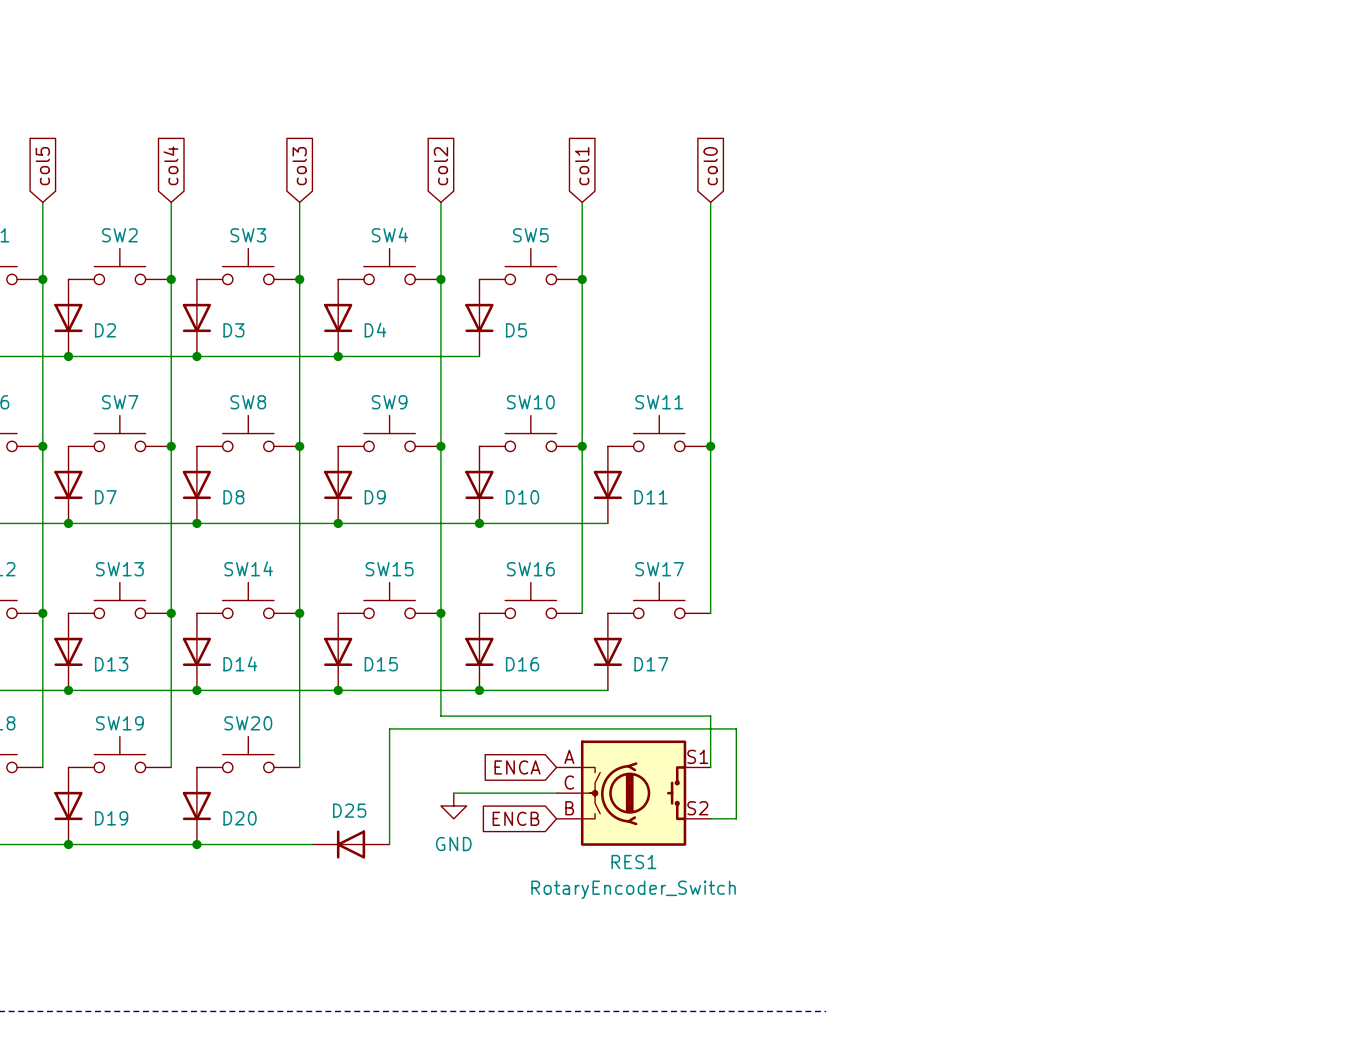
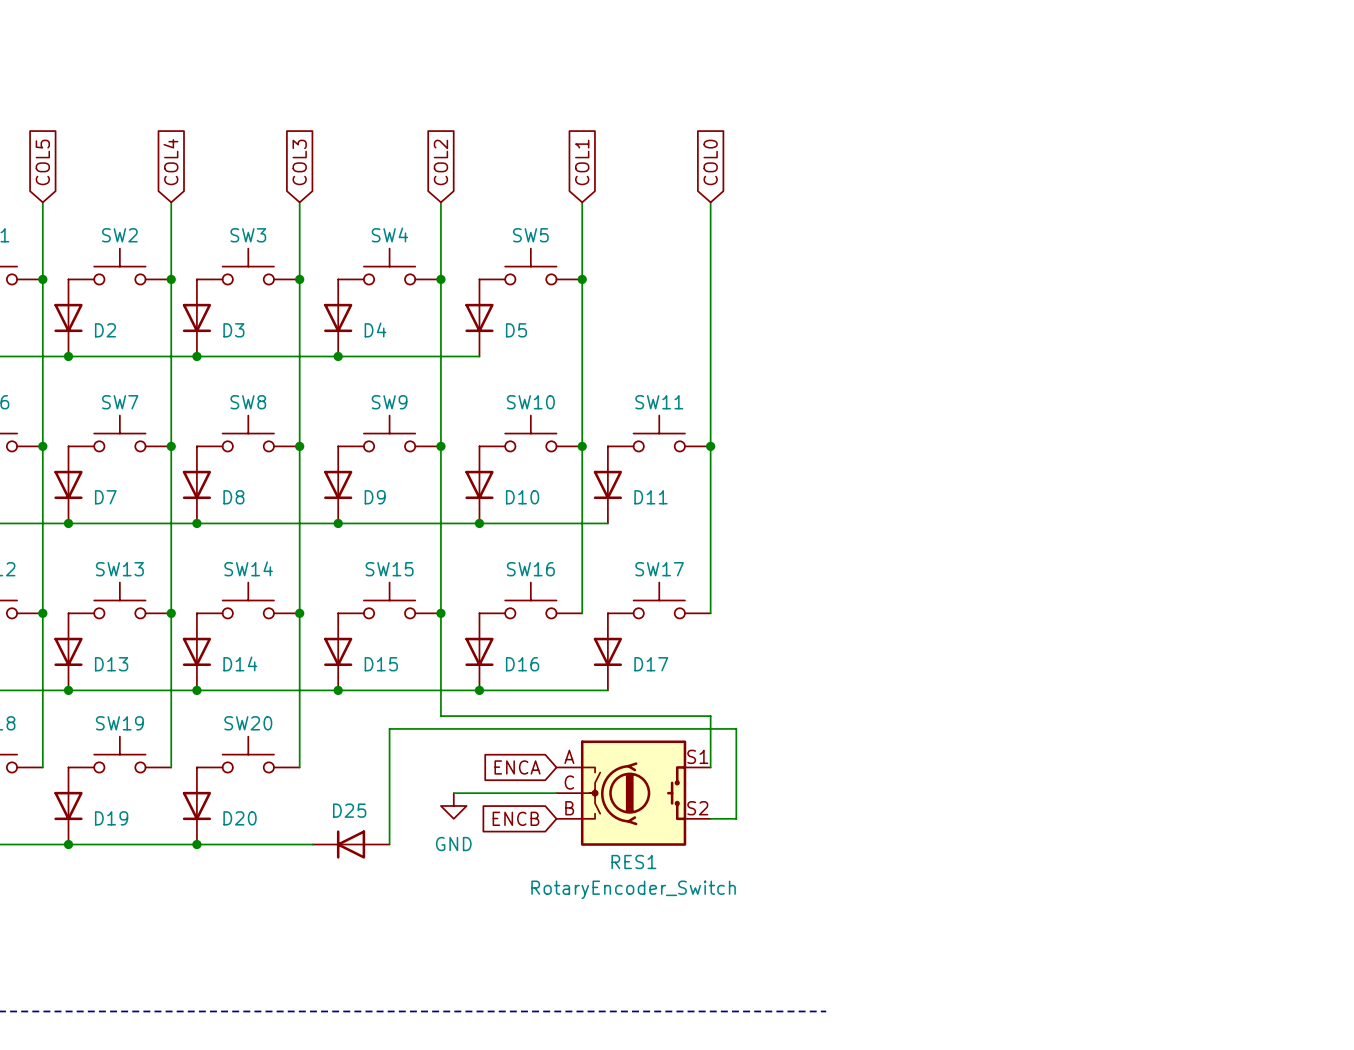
global label: col4 (170, 165) -> COL4 (170, 162)
global label: col5 (42, 166) -> COL5 (42, 162)
global label: col3 (299, 166) -> COL3 (299, 162)
global label: col2 (440, 166) -> COL2 (440, 162)
global label: col1 (582, 166) -> COL1 (582, 162)
global label: col0 (710, 166) -> COL0 (710, 162)

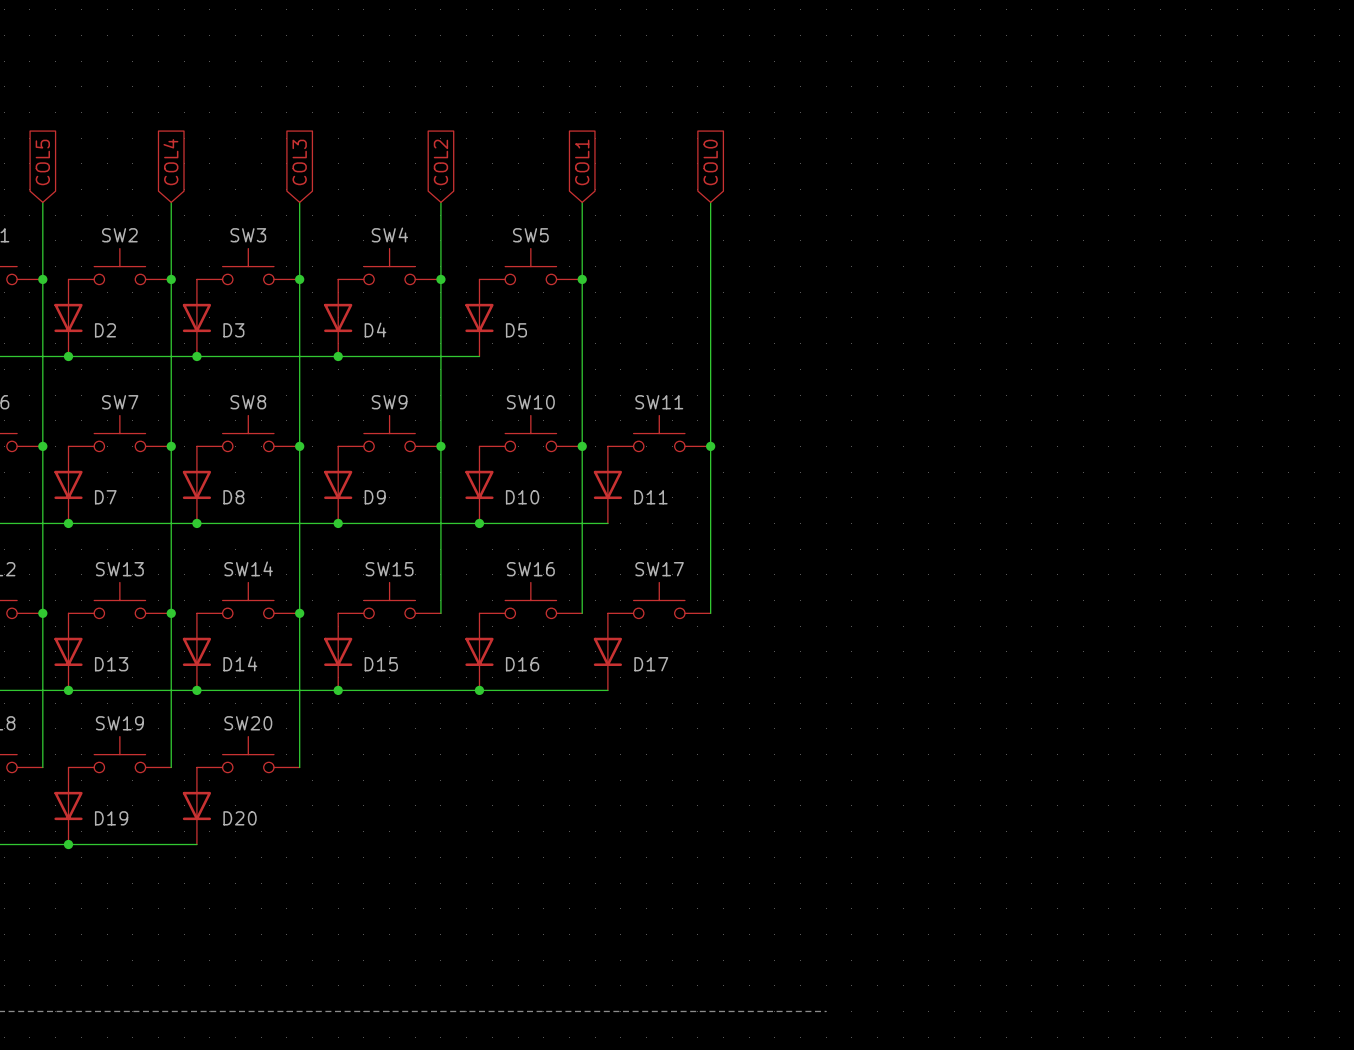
wire: (440, 613) (440, 716) (710, 716) (710, 767) -> none
junction: (440, 613) -> none
global label: ENCA (517, 767) -> none
wire: (453, 793) (556, 793) -> none
RES1: RotaryEncoder_Switch (633, 793) -> none
power symbol: GND (453, 805) -> none
global label: ENCB (515, 818) -> none
wire: (710, 818) (736, 818) (736, 728) (389, 728) (389, 844) -> none
wire: (196, 844) (312, 844) -> none
junction: (196, 844) -> none
D25: (351, 844) -> none

